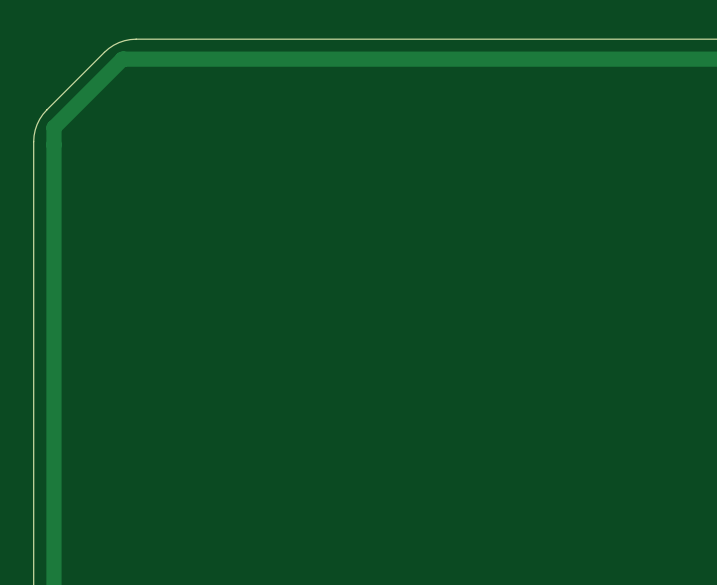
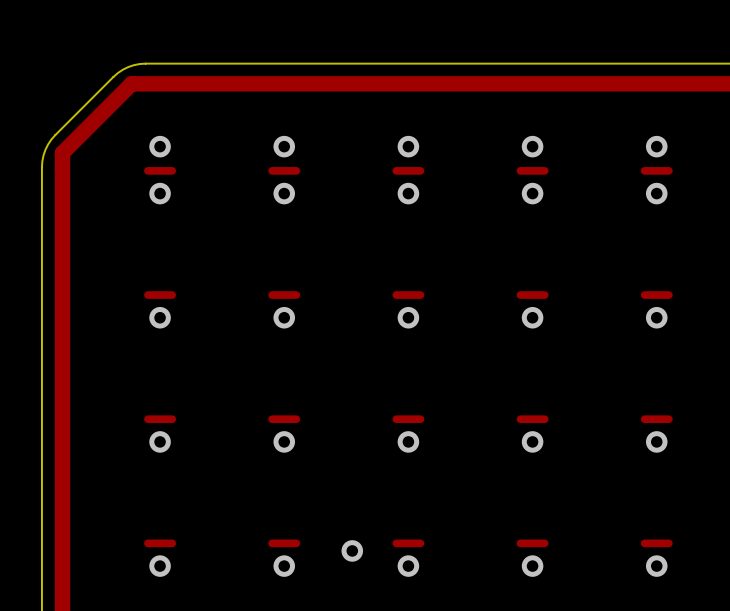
via: none -> (160, 146)
via: none -> (284, 146)
via: none -> (408, 146)
via: none -> (532, 146)
via: none -> (656, 146)
track: none -> (147, 170) (172, 170)
track: none -> (272, 170) (296, 170)
track: none -> (396, 170) (420, 170)
track: none -> (520, 170) (544, 170)
track: none -> (644, 170) (668, 170)
via: none -> (160, 193)
via: none -> (284, 193)
via: none -> (408, 193)
via: none -> (532, 193)
via: none -> (656, 193)
track: none -> (147, 295) (172, 295)
track: none -> (272, 295) (296, 295)
track: none -> (396, 295) (420, 295)
track: none -> (520, 295) (544, 295)
track: none -> (644, 295) (668, 295)
via: none -> (160, 317)
via: none -> (284, 317)
via: none -> (408, 317)
via: none -> (532, 317)
via: none -> (656, 317)
track: none -> (147, 419) (172, 419)
track: none -> (272, 419) (296, 419)
track: none -> (396, 419) (420, 419)
track: none -> (520, 419) (544, 419)
track: none -> (644, 419) (668, 419)
via: none -> (160, 441)
via: none -> (284, 441)
via: none -> (408, 441)
via: none -> (532, 441)
via: none -> (656, 441)
track: none -> (147, 543) (172, 543)
track: none -> (272, 543) (296, 543)
track: none -> (396, 543) (420, 543)
track: none -> (520, 543) (544, 543)
track: none -> (644, 543) (668, 543)
via: none -> (352, 550)
via: none -> (160, 566)
via: none -> (284, 566)
via: none -> (408, 566)
via: none -> (532, 566)
via: none -> (656, 566)

